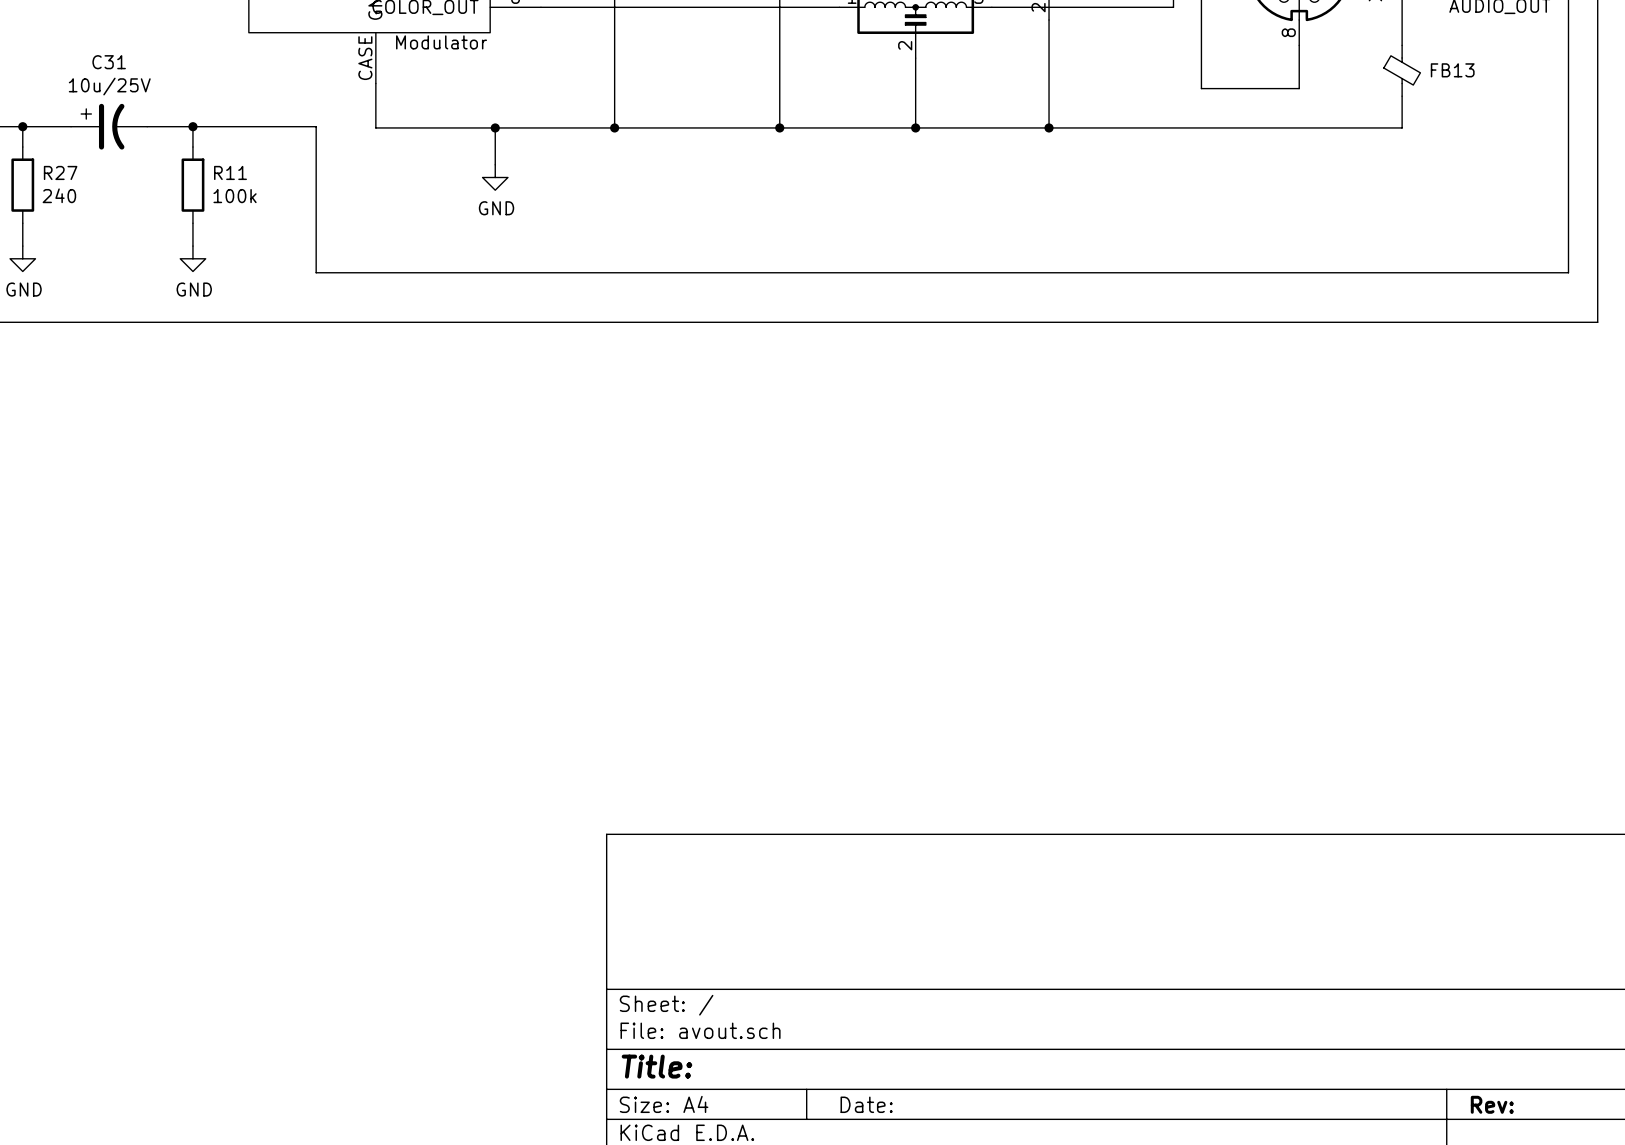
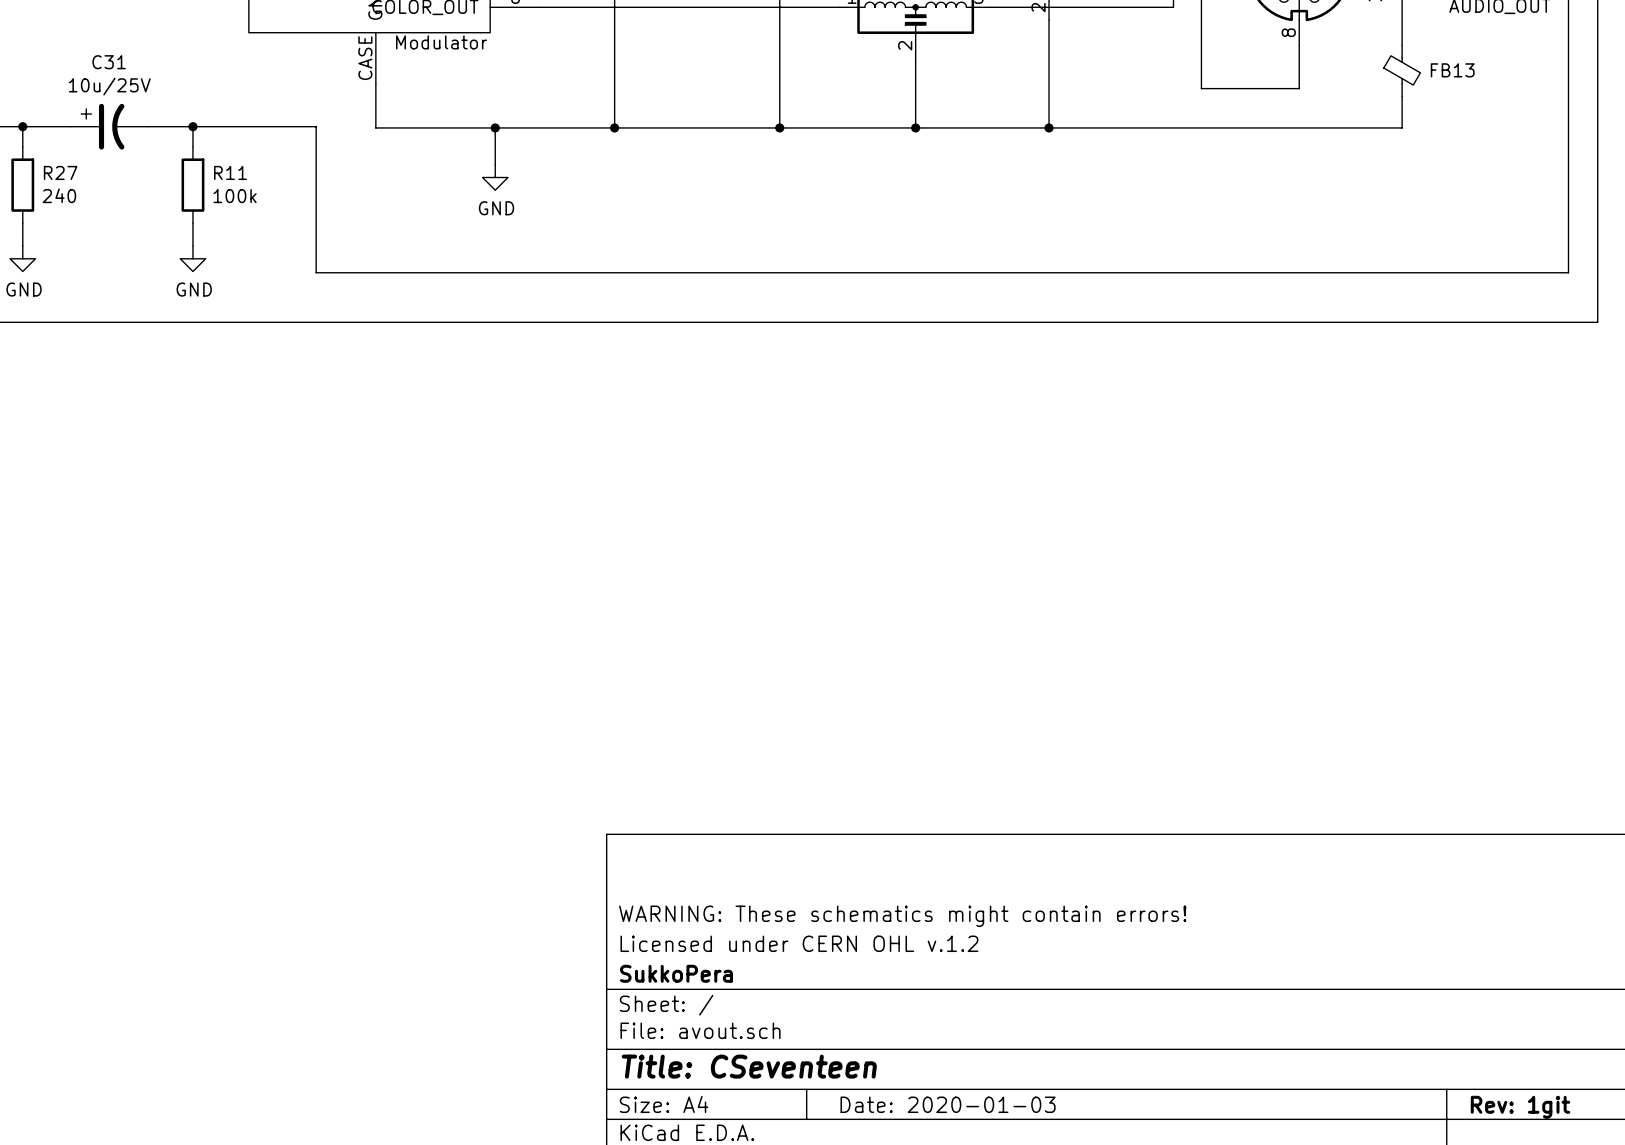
title block: none -> WARNING: These schematics might contain errors! (902, 916)
title block: none -> Licensed under CERN OHL v.1.2 (799, 943)
title block: none -> SukkoPera (676, 973)
title block: Title: (656, 1066) -> Title: CSeventeen (749, 1066)
title block: Date: (866, 1104) -> Date: 2020-01-03 (948, 1104)
title block: Rev: (1492, 1104) -> Rev: 1git (1520, 1107)

